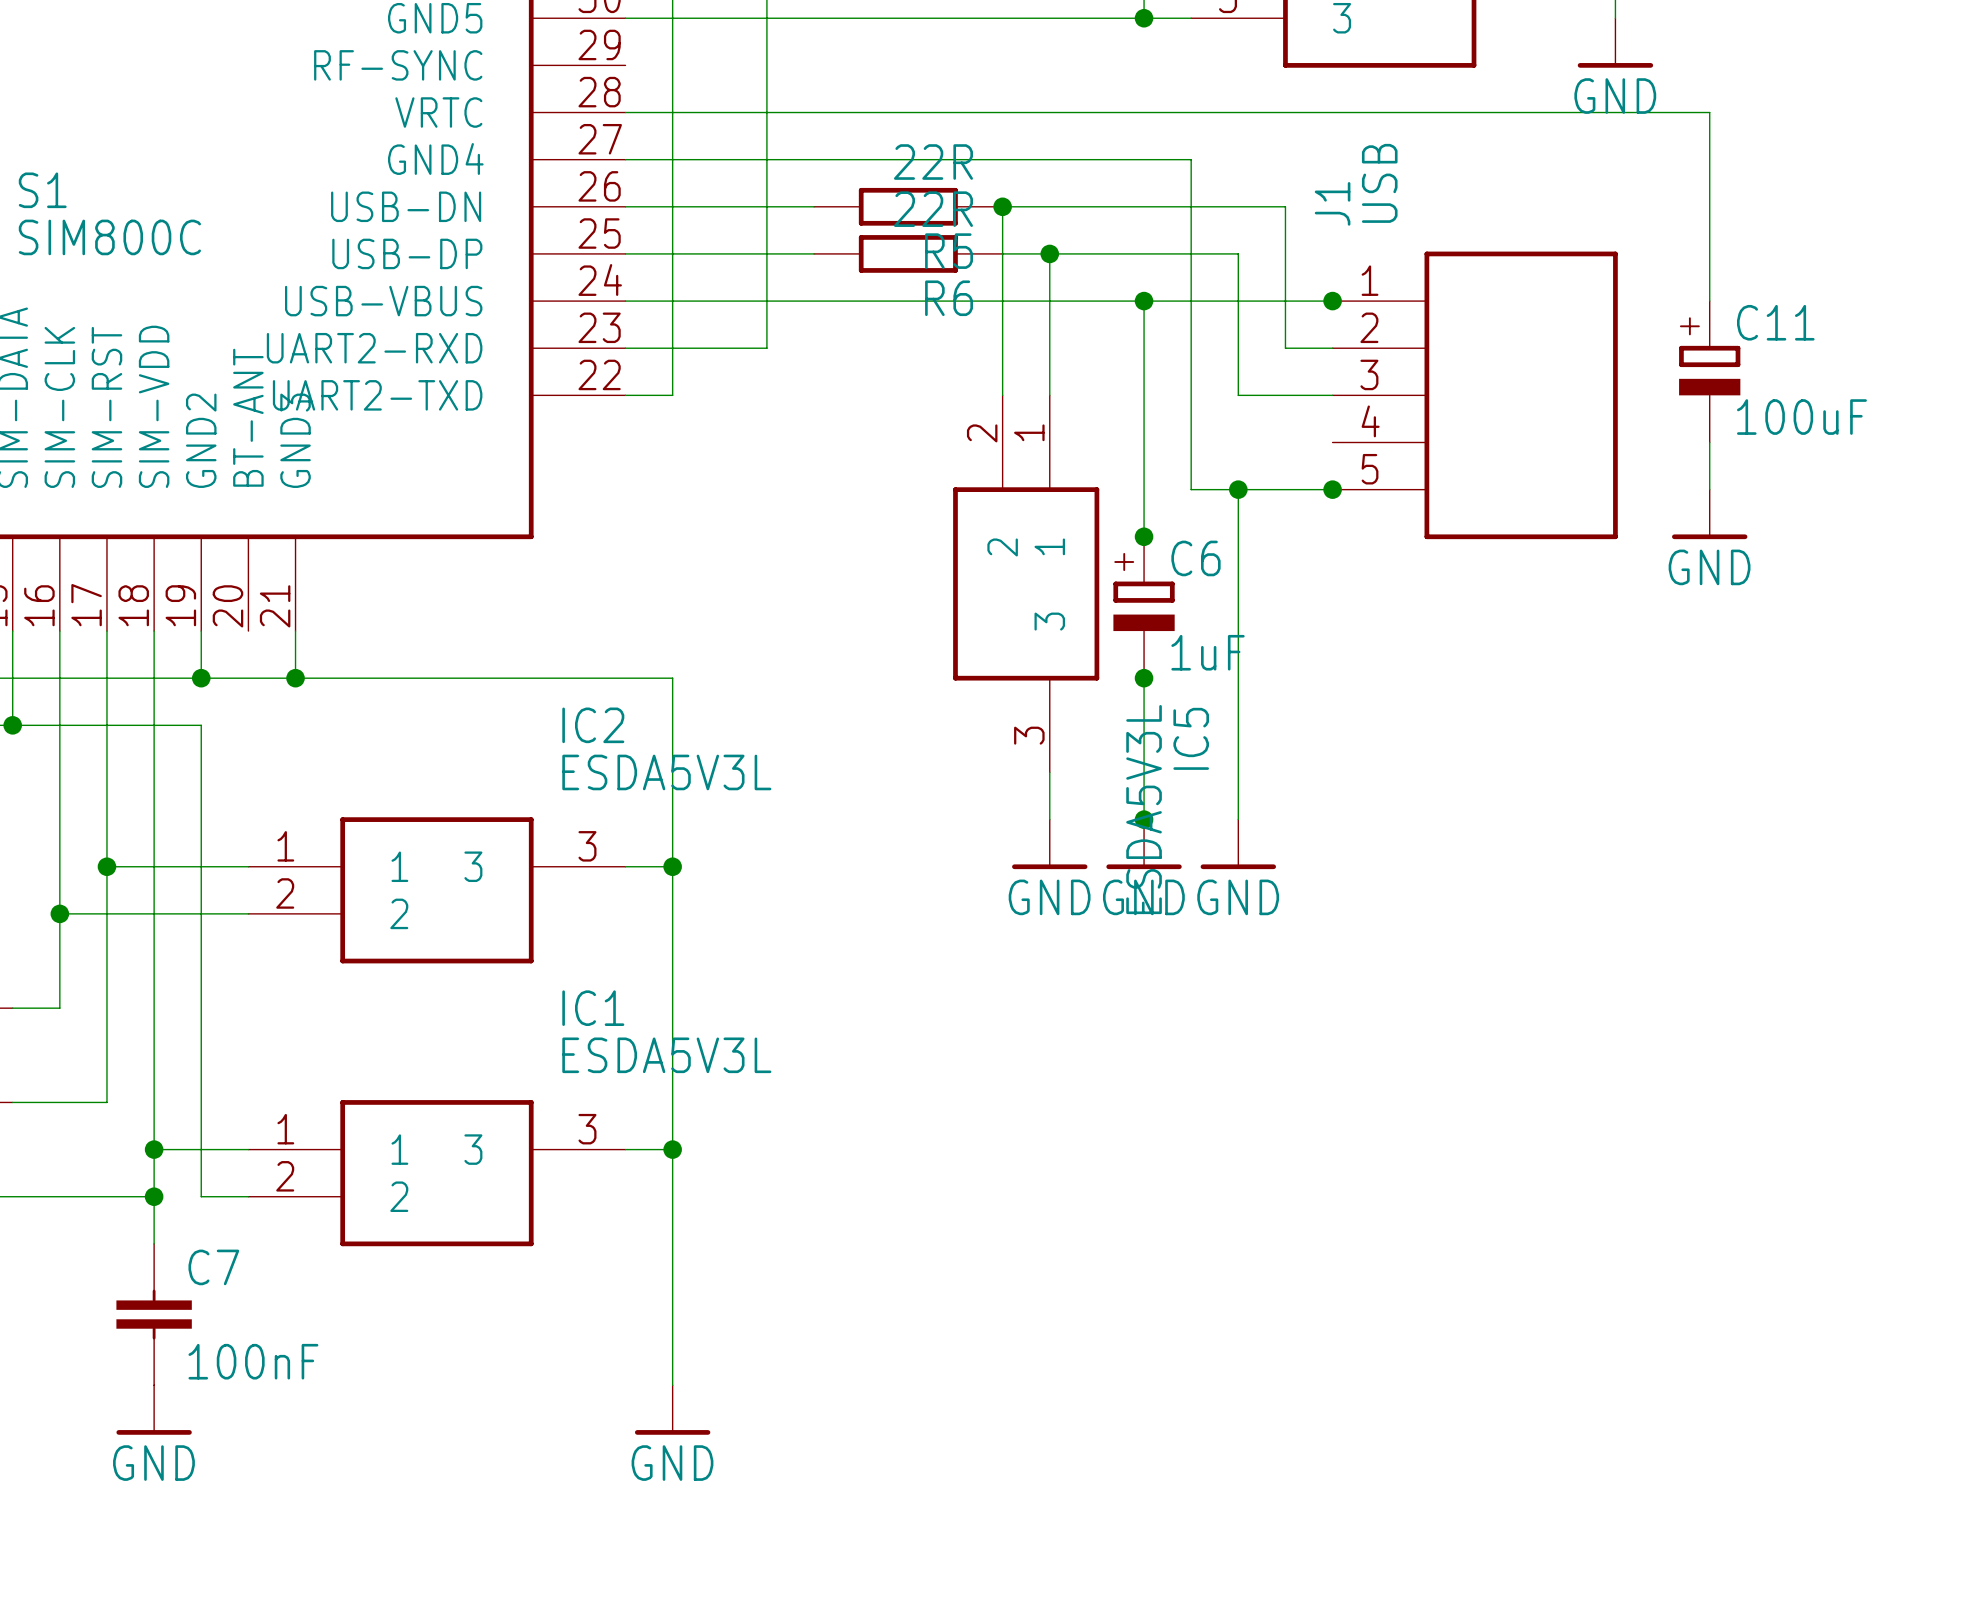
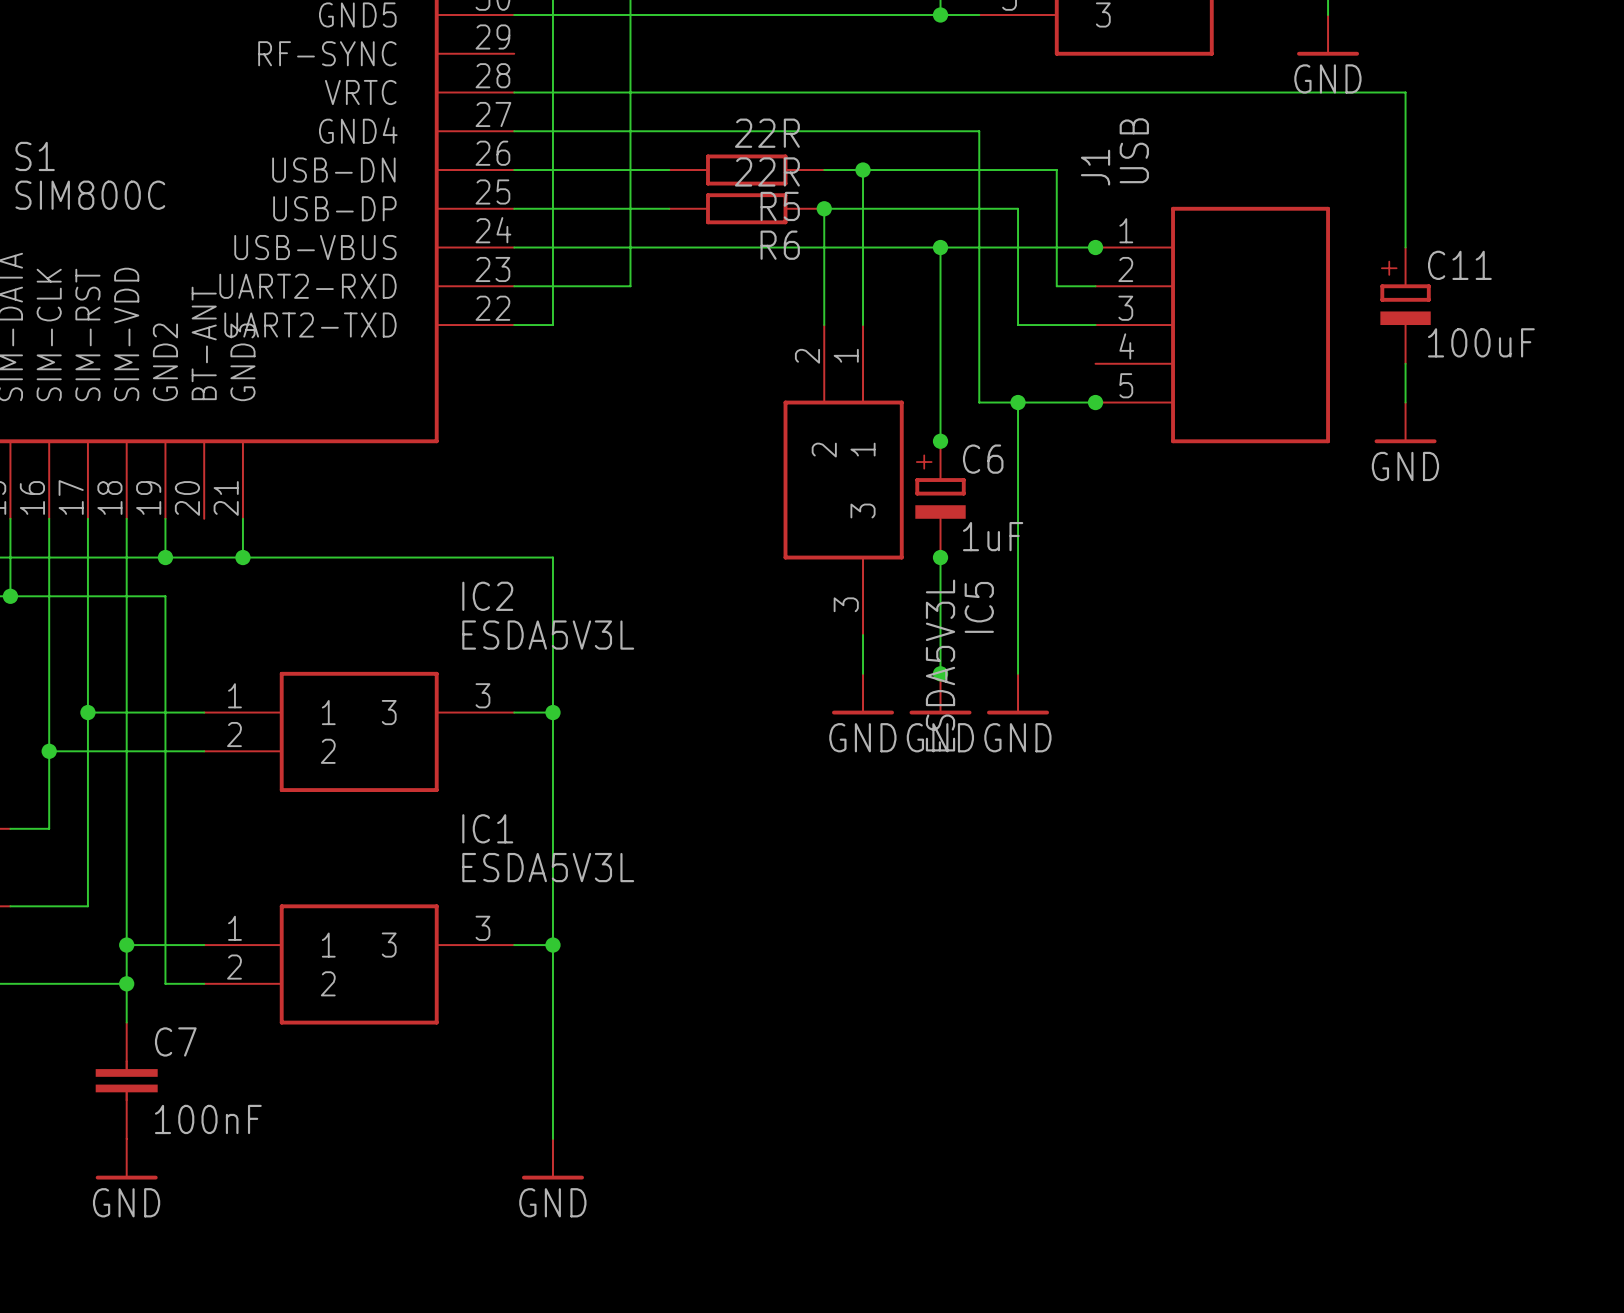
wire: (1002, 206) (1002, 253) -> (863, 170) (863, 208)
junction: (1002, 206) -> none
junction: none -> (863, 170)
junction: none -> (824, 208)
junction: (1049, 253) -> none

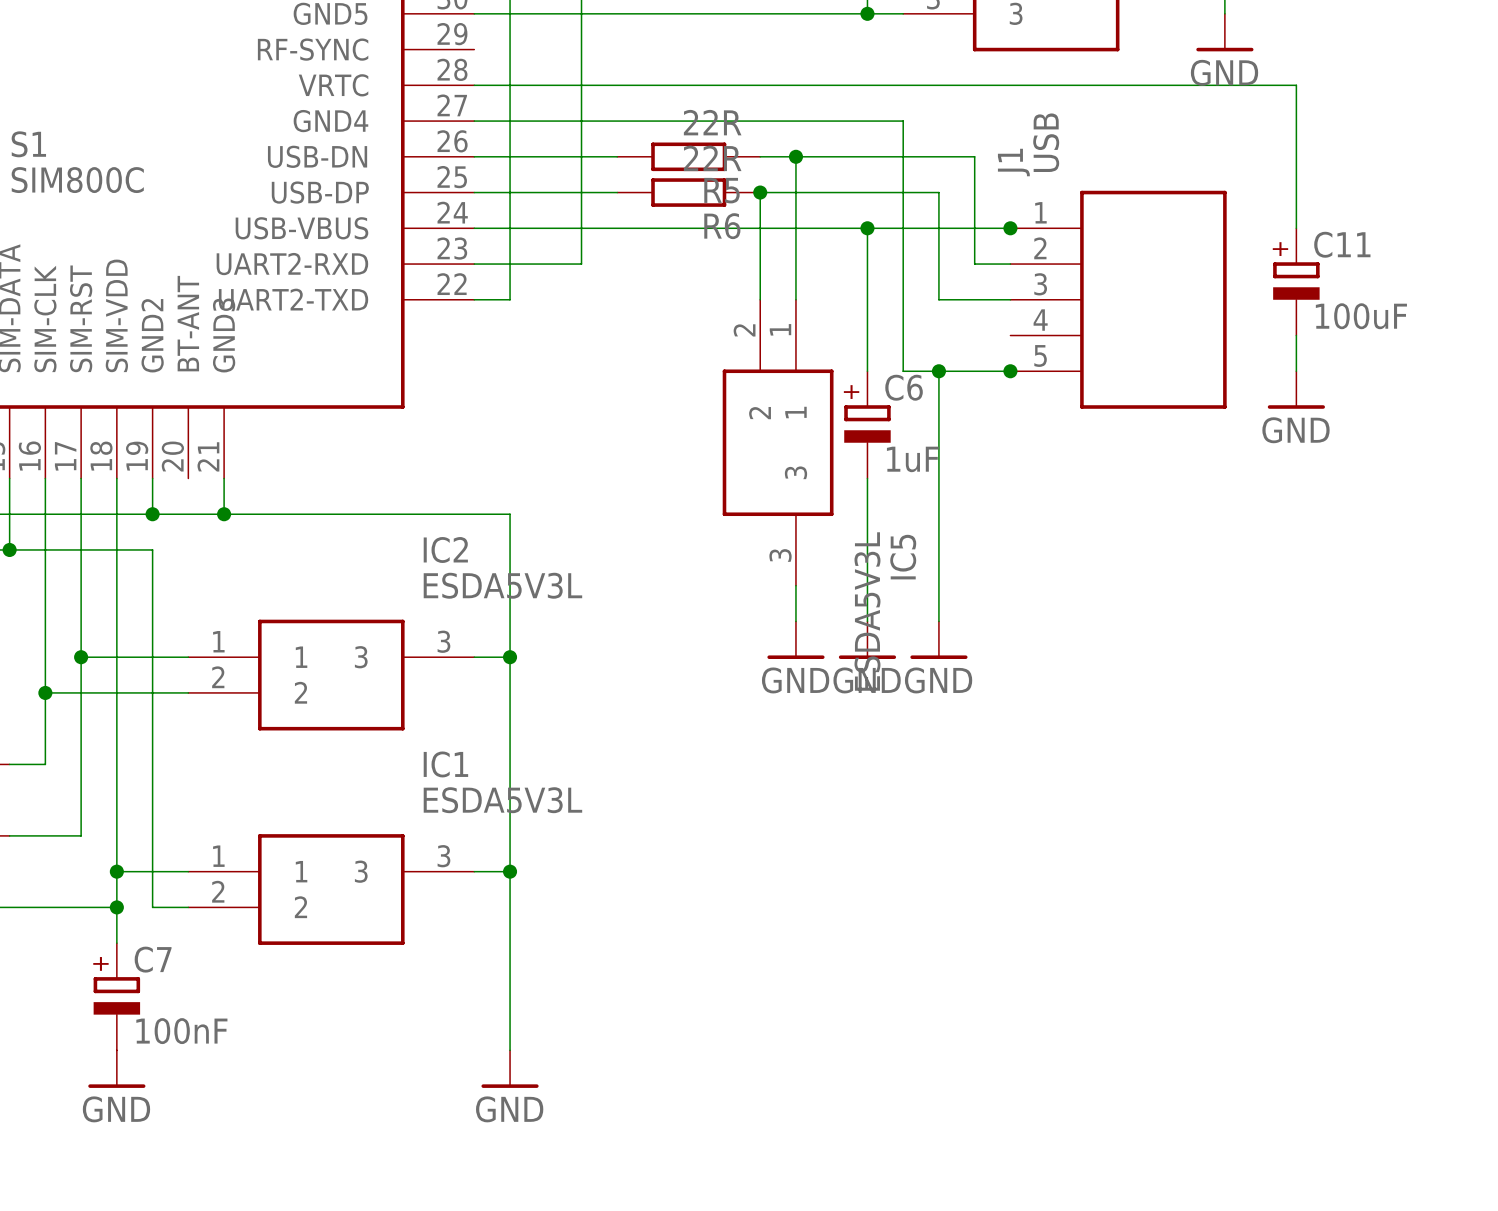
junction: (940, 441) -> none
C6 position: (940, 499) -> (867, 424)
junction: (940, 557) -> none
junction: (940, 673) -> none
C7 symbol: [95, 1022, 158, 1139] -> [93, 943, 141, 1051]

